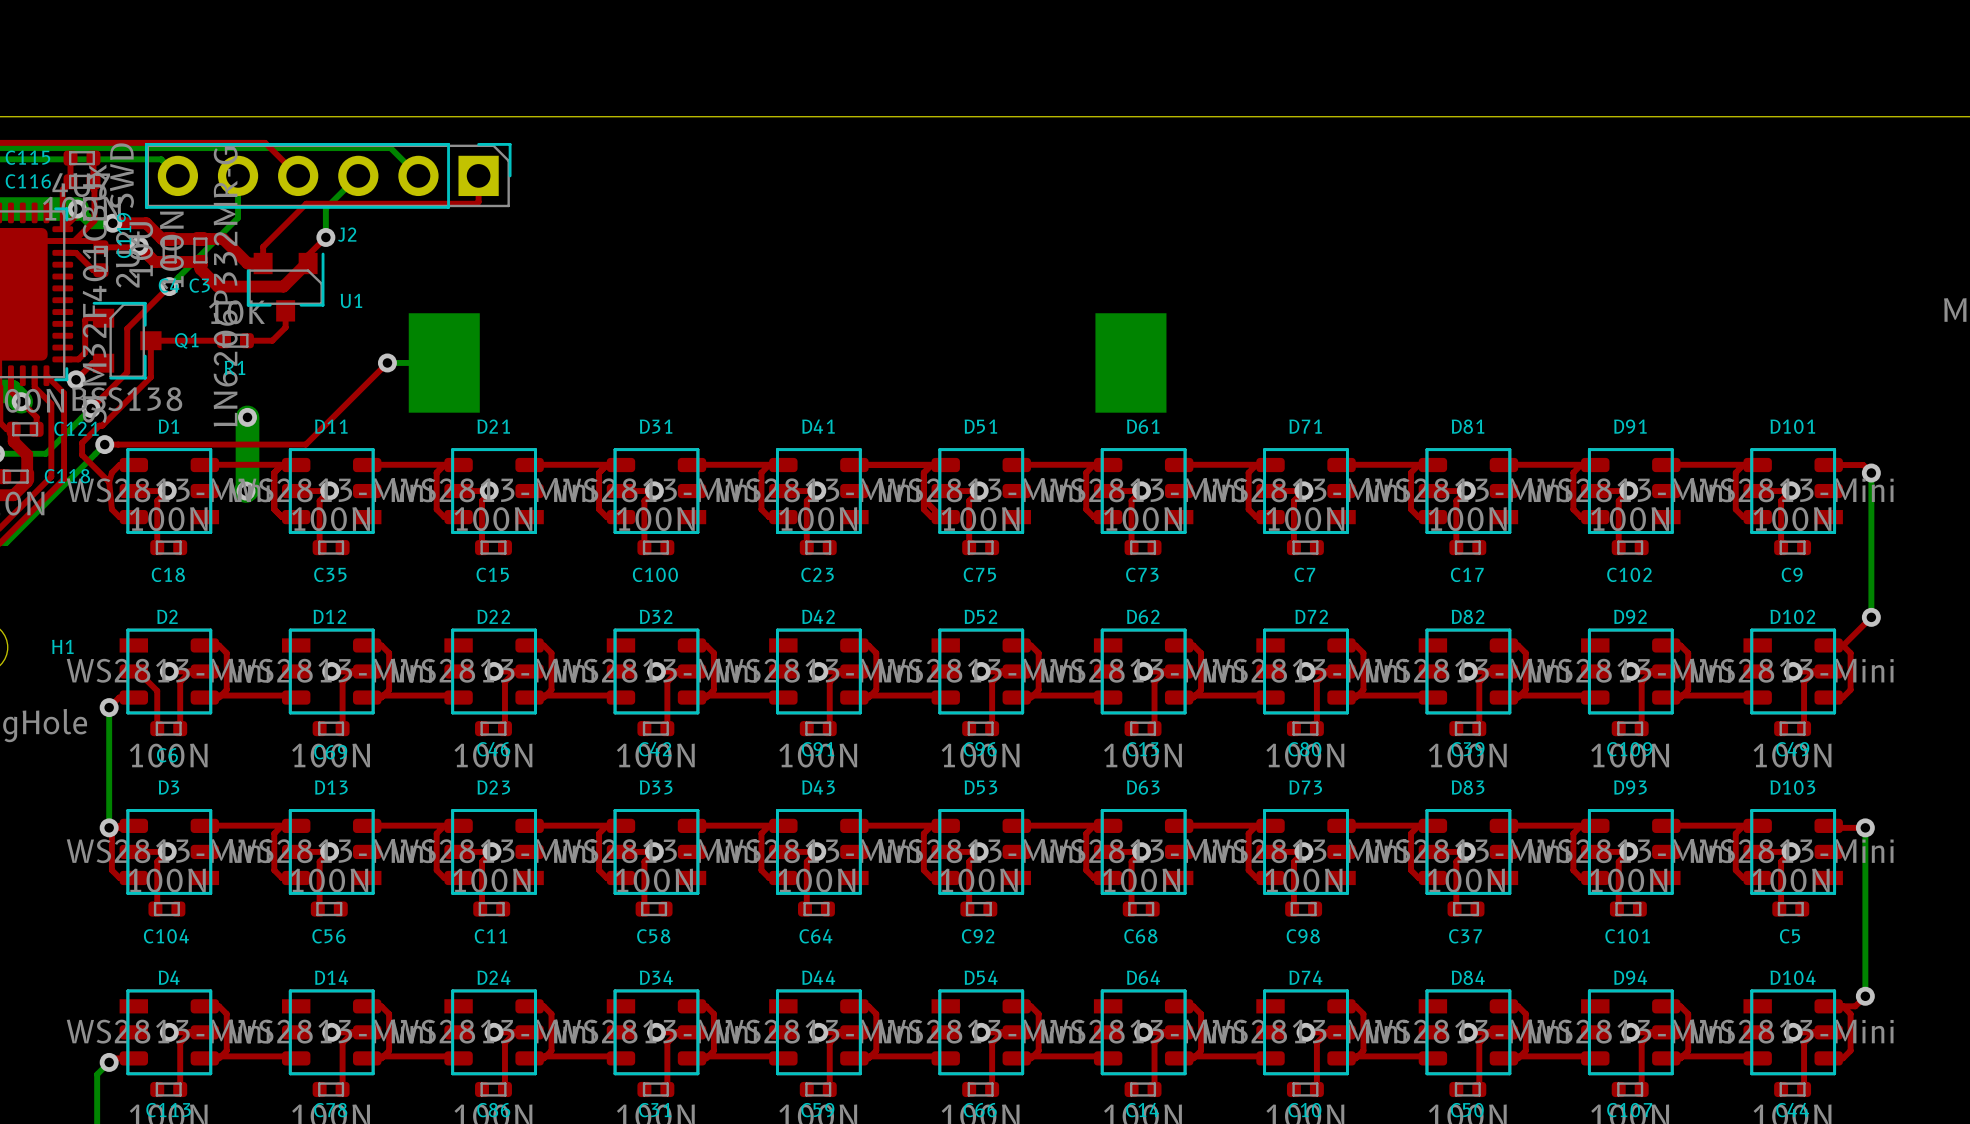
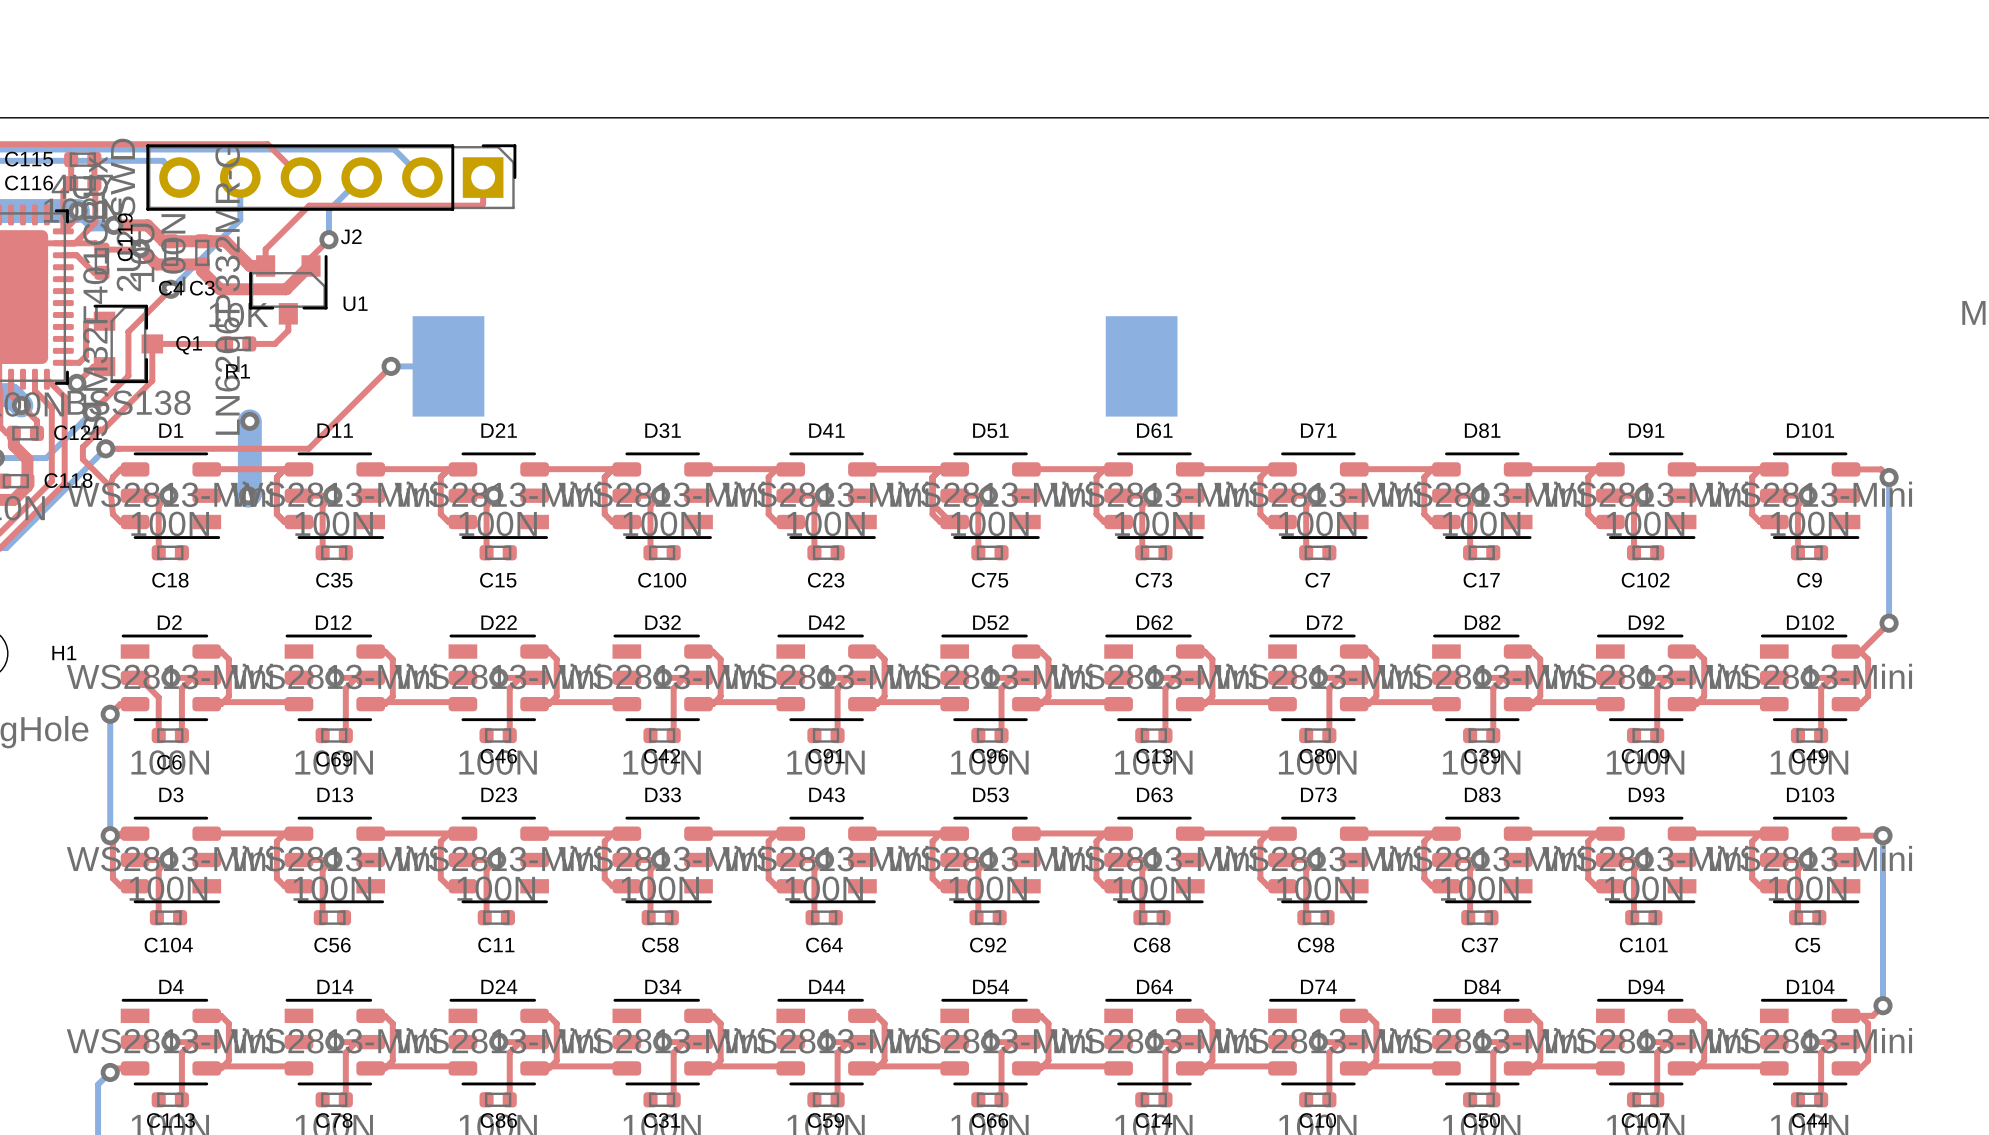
D1 footprint: [119, 448, 220, 534] -> [120, 452, 222, 539]
D11 footprint: [281, 448, 382, 534] -> [284, 452, 386, 539]
D21 footprint: [444, 448, 544, 534] -> [448, 452, 549, 539]
D31 footprint: [606, 448, 707, 534] -> [612, 452, 713, 539]
D41 footprint: [769, 448, 869, 534] -> [776, 452, 877, 539]
D51 footprint: [931, 448, 1031, 534] -> [940, 452, 1041, 539]
D61 footprint: [1093, 448, 1194, 534] -> [1104, 452, 1205, 539]
D71 footprint: [1256, 448, 1356, 534] -> [1268, 452, 1369, 539]
D81 footprint: [1418, 448, 1519, 534] -> [1432, 452, 1533, 539]
D91 footprint: [1581, 448, 1681, 534] -> [1596, 452, 1697, 539]
D101 footprint: [1743, 448, 1843, 534] -> [1759, 452, 1861, 539]
D2 footprint: [119, 628, 220, 715] -> [120, 634, 222, 722]
D12 footprint: [281, 628, 382, 715] -> [284, 634, 386, 722]
D22 footprint: [444, 628, 544, 715] -> [448, 634, 549, 722]
D32 footprint: [606, 628, 707, 715] -> [612, 634, 713, 722]
D42 footprint: [769, 628, 869, 715] -> [776, 634, 877, 722]
D52 footprint: [931, 628, 1031, 715] -> [940, 634, 1041, 722]
D62 footprint: [1093, 628, 1194, 715] -> [1104, 634, 1205, 722]
D72 footprint: [1256, 628, 1356, 715] -> [1268, 634, 1369, 722]
D82 footprint: [1418, 628, 1519, 715] -> [1432, 634, 1533, 722]
D92 footprint: [1581, 628, 1681, 715] -> [1596, 634, 1697, 722]
D102 footprint: [1743, 628, 1843, 715] -> [1759, 634, 1861, 722]
D3 footprint: [119, 809, 220, 895] -> [120, 816, 222, 904]
D13 footprint: [281, 809, 382, 895] -> [284, 816, 386, 904]
D23 footprint: [444, 809, 544, 895] -> [448, 816, 549, 904]
D33 footprint: [606, 809, 707, 895] -> [612, 816, 713, 904]
D43 footprint: [769, 809, 869, 895] -> [776, 816, 877, 904]
D53 footprint: [931, 809, 1031, 895] -> [940, 816, 1041, 904]
D63 footprint: [1093, 809, 1194, 895] -> [1104, 816, 1205, 904]
D73 footprint: [1256, 809, 1356, 895] -> [1268, 816, 1369, 904]
D83 footprint: [1418, 809, 1519, 895] -> [1432, 816, 1533, 904]
D93 footprint: [1581, 809, 1681, 895] -> [1596, 816, 1697, 904]
D103 footprint: [1743, 809, 1843, 895] -> [1759, 816, 1861, 904]
D4 footprint: [119, 989, 220, 1076] -> [120, 998, 222, 1086]
D14 footprint: [281, 989, 382, 1076] -> [284, 998, 386, 1086]
D24 footprint: [444, 989, 544, 1076] -> [448, 998, 549, 1086]
D34 footprint: [606, 989, 707, 1076] -> [612, 998, 713, 1086]
D44 footprint: [769, 989, 869, 1076] -> [776, 998, 877, 1086]
D54 footprint: [931, 989, 1031, 1076] -> [940, 998, 1041, 1086]
D64 footprint: [1093, 989, 1194, 1076] -> [1104, 998, 1205, 1086]
D74 footprint: [1256, 989, 1356, 1076] -> [1268, 998, 1369, 1086]
D84 footprint: [1418, 989, 1519, 1076] -> [1432, 998, 1533, 1086]
D94 footprint: [1581, 989, 1681, 1076] -> [1596, 998, 1697, 1086]
D104 footprint: [1743, 989, 1843, 1076] -> [1759, 998, 1861, 1086]

